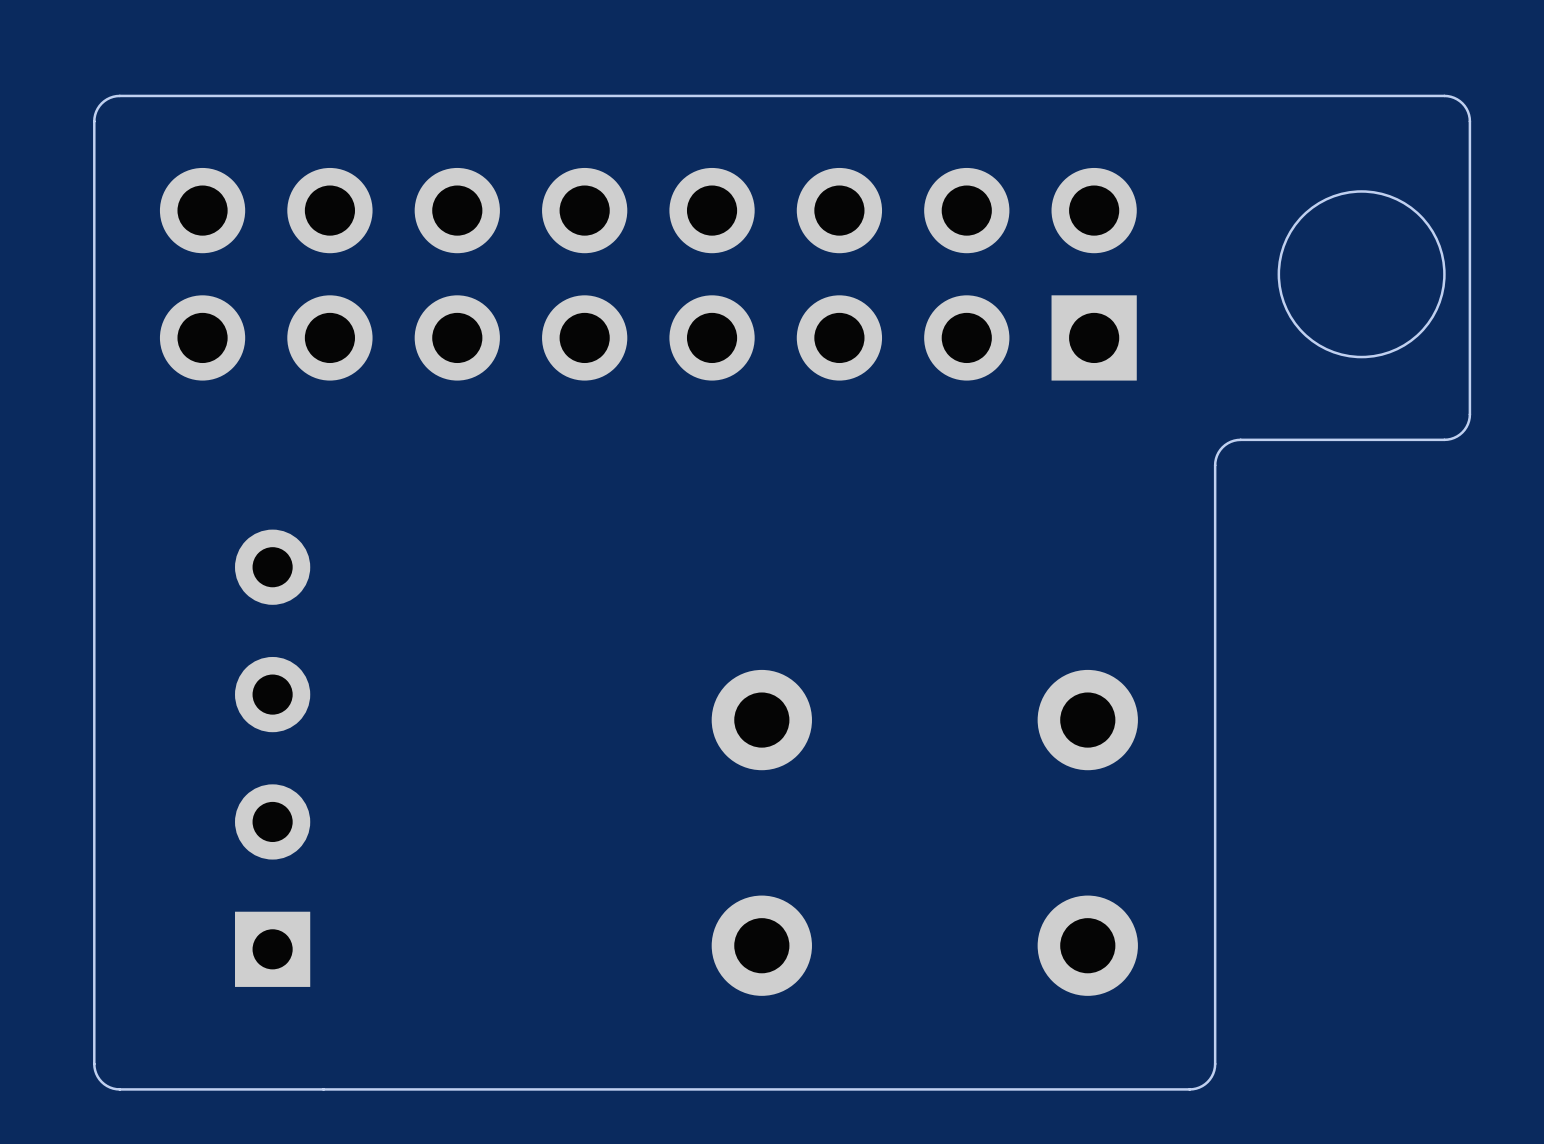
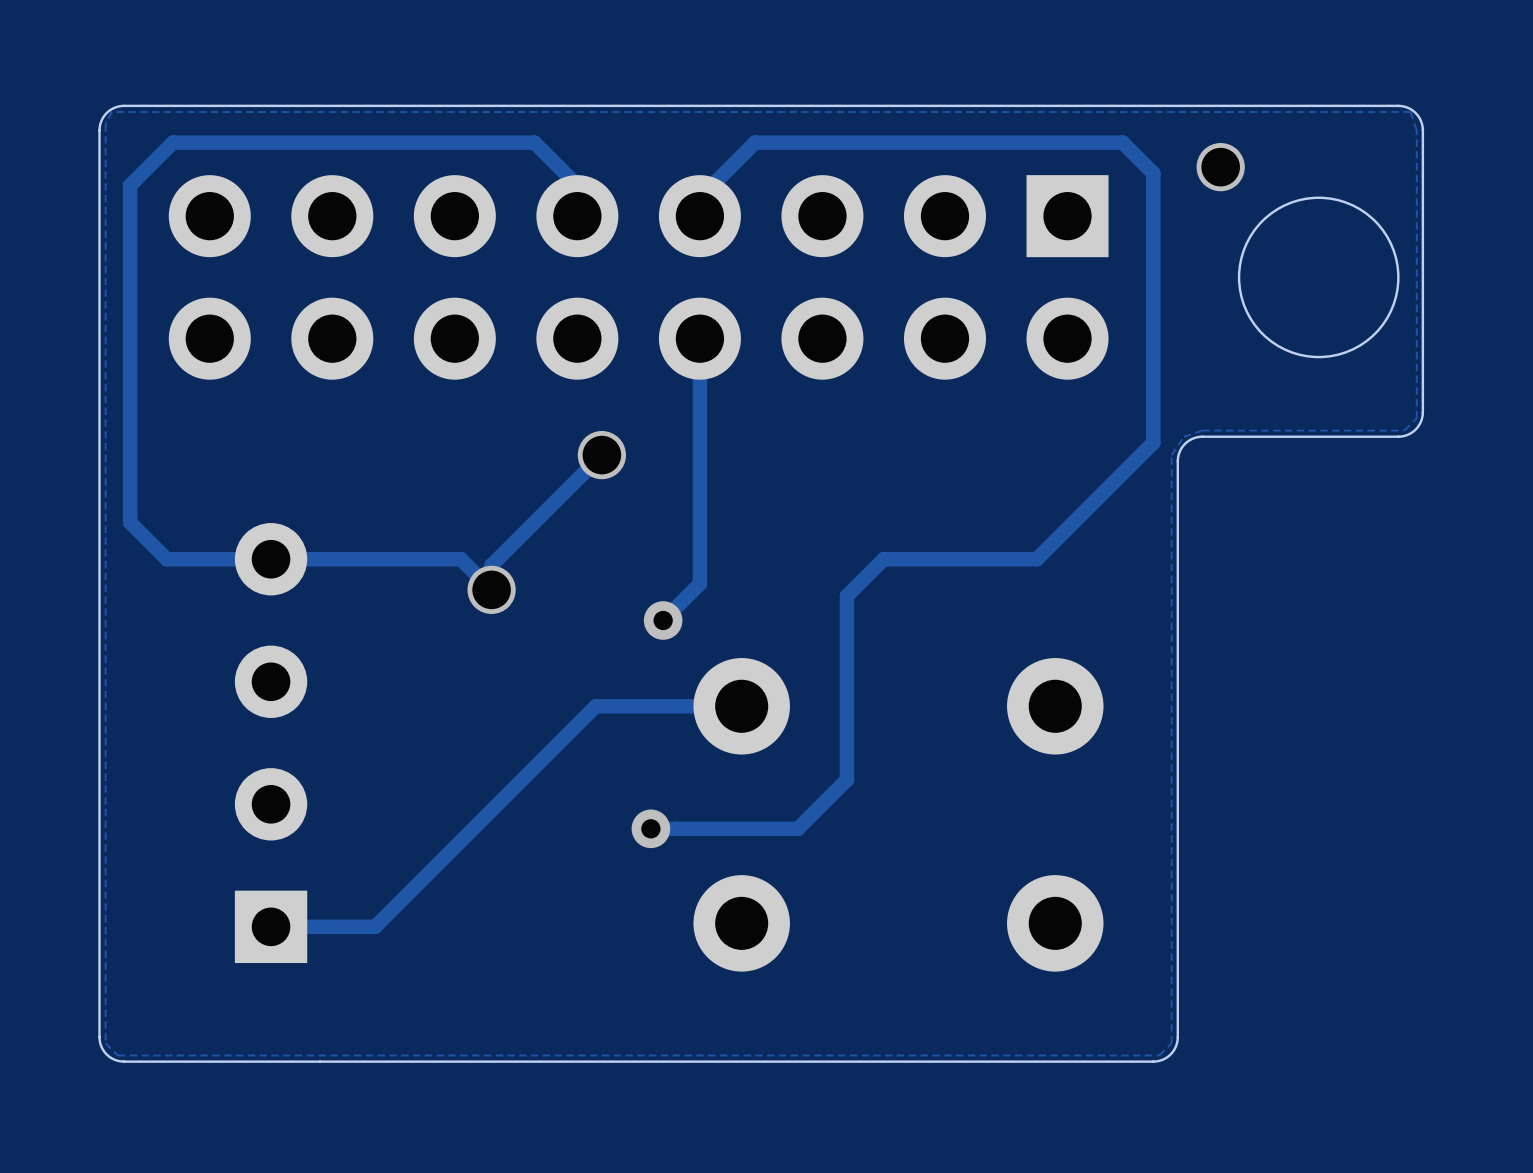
zone outline: none -> (1410, 111) (1416, 130) (1416, 418) (1404, 430) (1202, 430) (1183, 436) (1171, 455) (1171, 1043) (1159, 1055) (117, 1055) (105, 1043) (105, 124) (111, 111) (1410, 111)
via: none -> (1220, 167)
part footprint: [159, 167, 1137, 381] -> [168, 175, 1109, 380]
track: none -> (577, 216) (577, 185) (534, 142) (173, 142) (130, 185) (130, 522) (166, 559) (460, 559) (491, 589) (491, 565) (601, 455)
track: none -> (718, 216) (699, 216) (699, 197) (755, 142) (1122, 142) (1153, 173) (1153, 442) (1036, 559) (883, 559) (846, 596) (846, 779) (797, 828) (650, 828)
track: none -> (699, 338) (699, 583) (663, 620)
via: none -> (601, 455)
via: none -> (491, 589)
via: none -> (663, 620)
track: none -> (741, 706) (595, 706) (375, 926) (271, 926)
via: none -> (650, 828)

